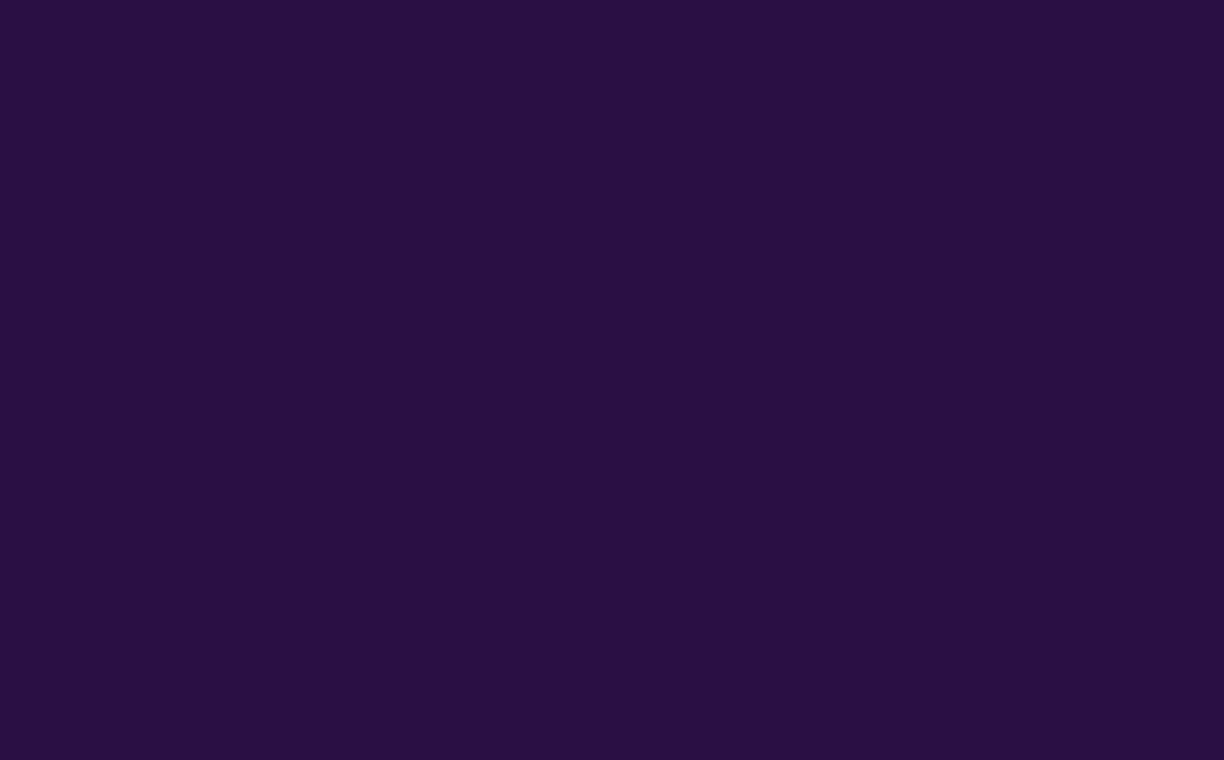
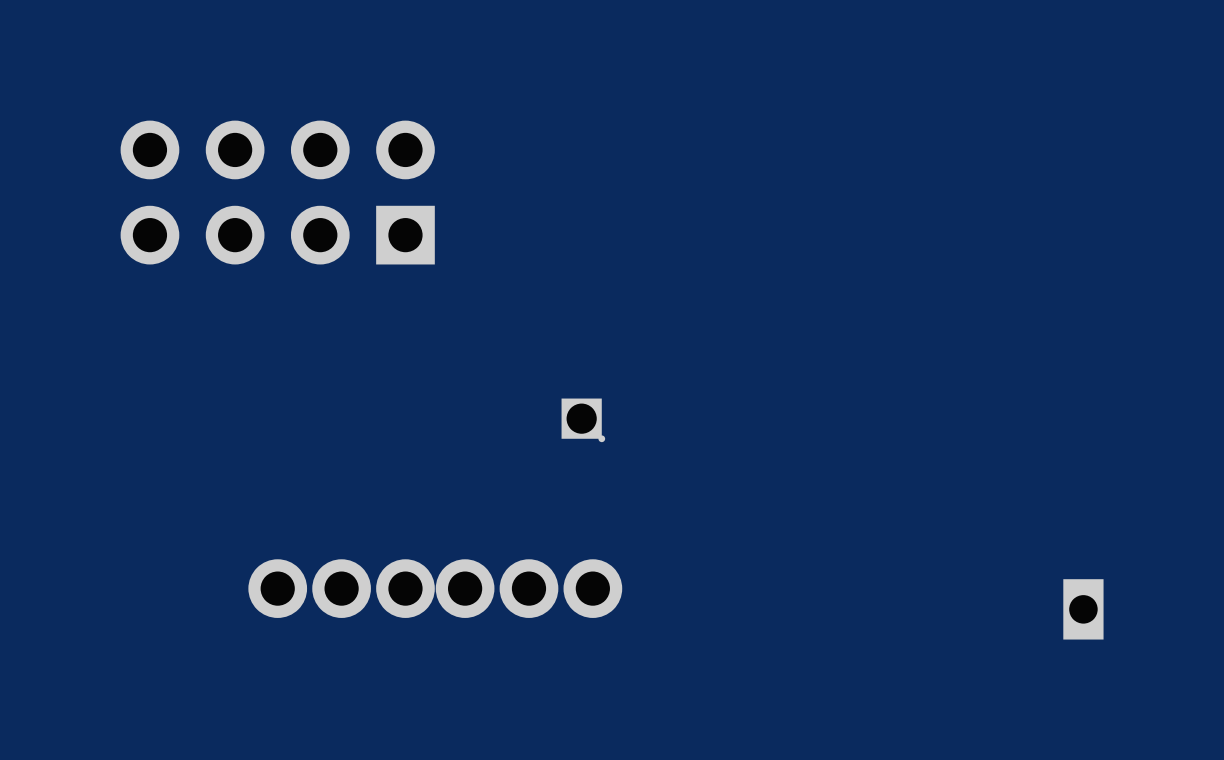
part: none -> (277, 192)
part: none -> (583, 420)
part: none -> (277, 588)
part: none -> (341, 588)
part: none -> (405, 588)
part: none -> (465, 588)
part: none -> (528, 588)
part: none -> (592, 588)
part: none -> (1083, 609)

